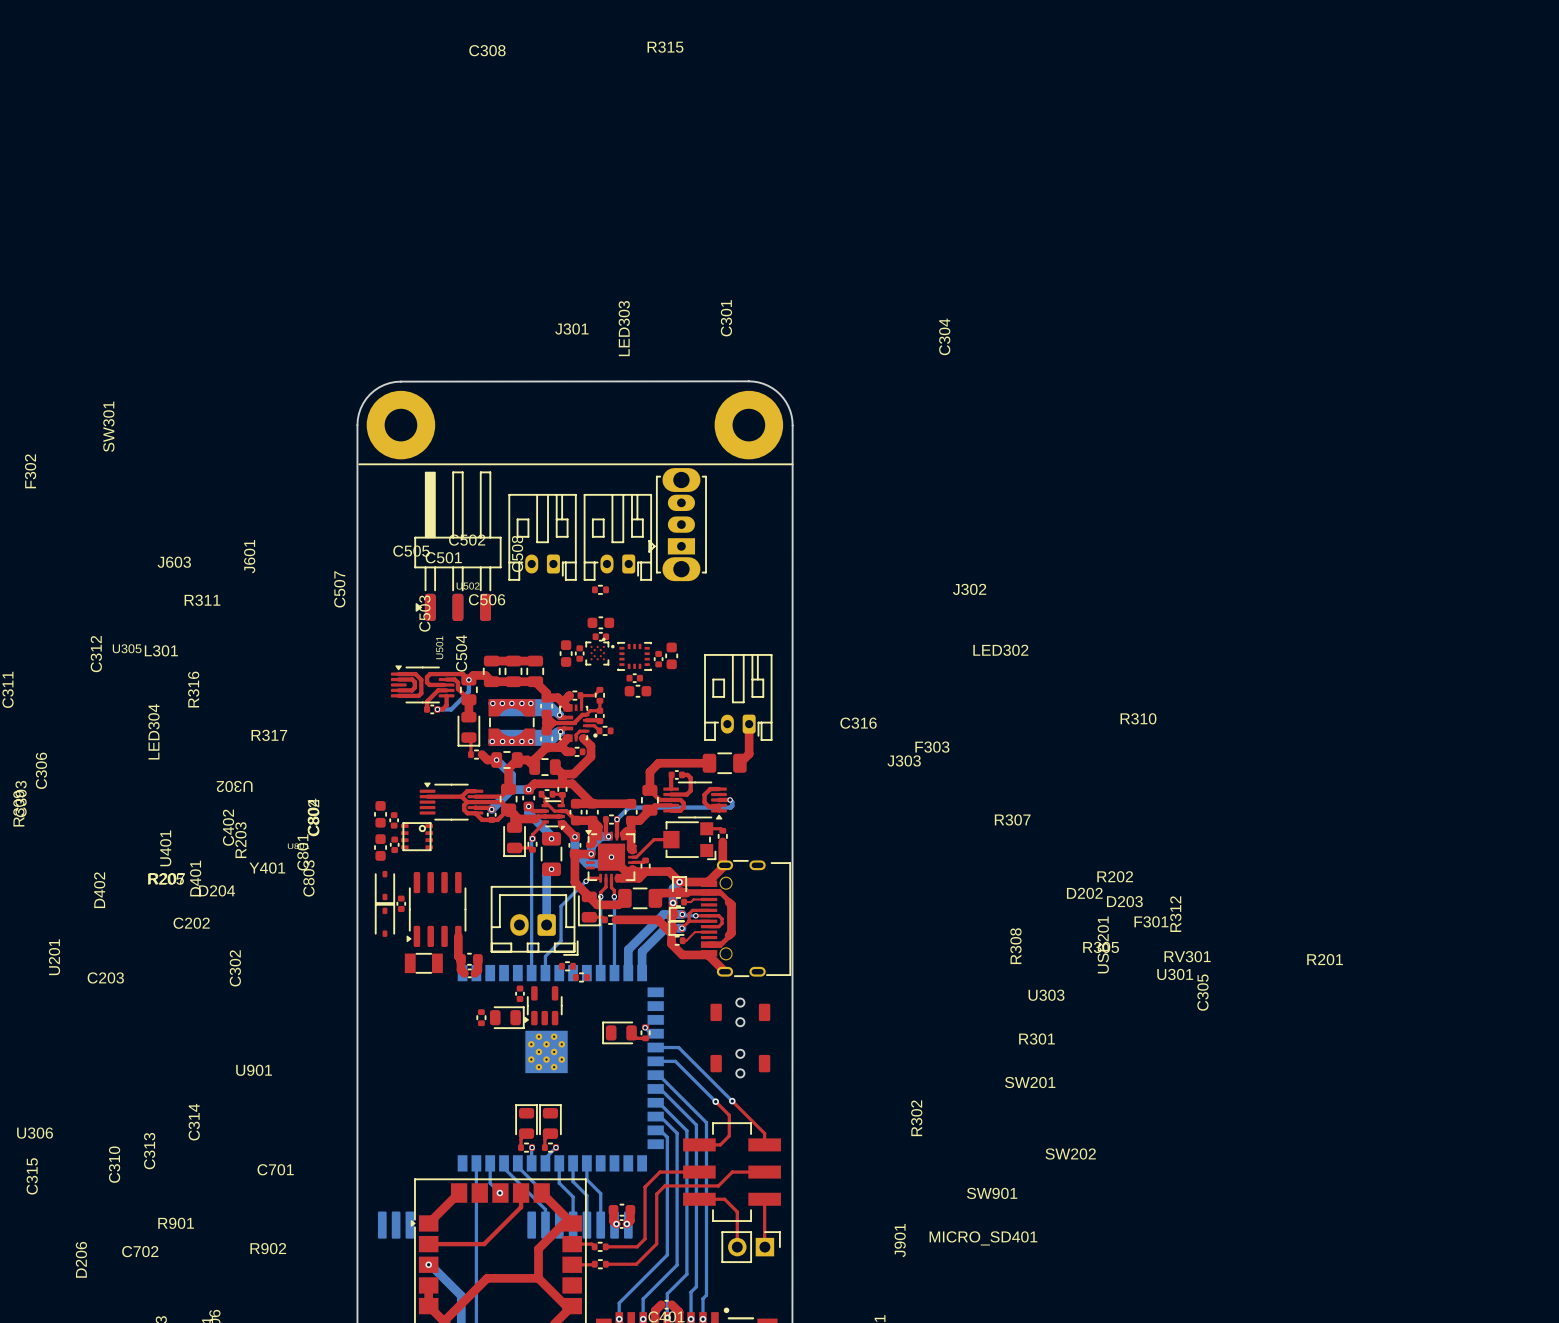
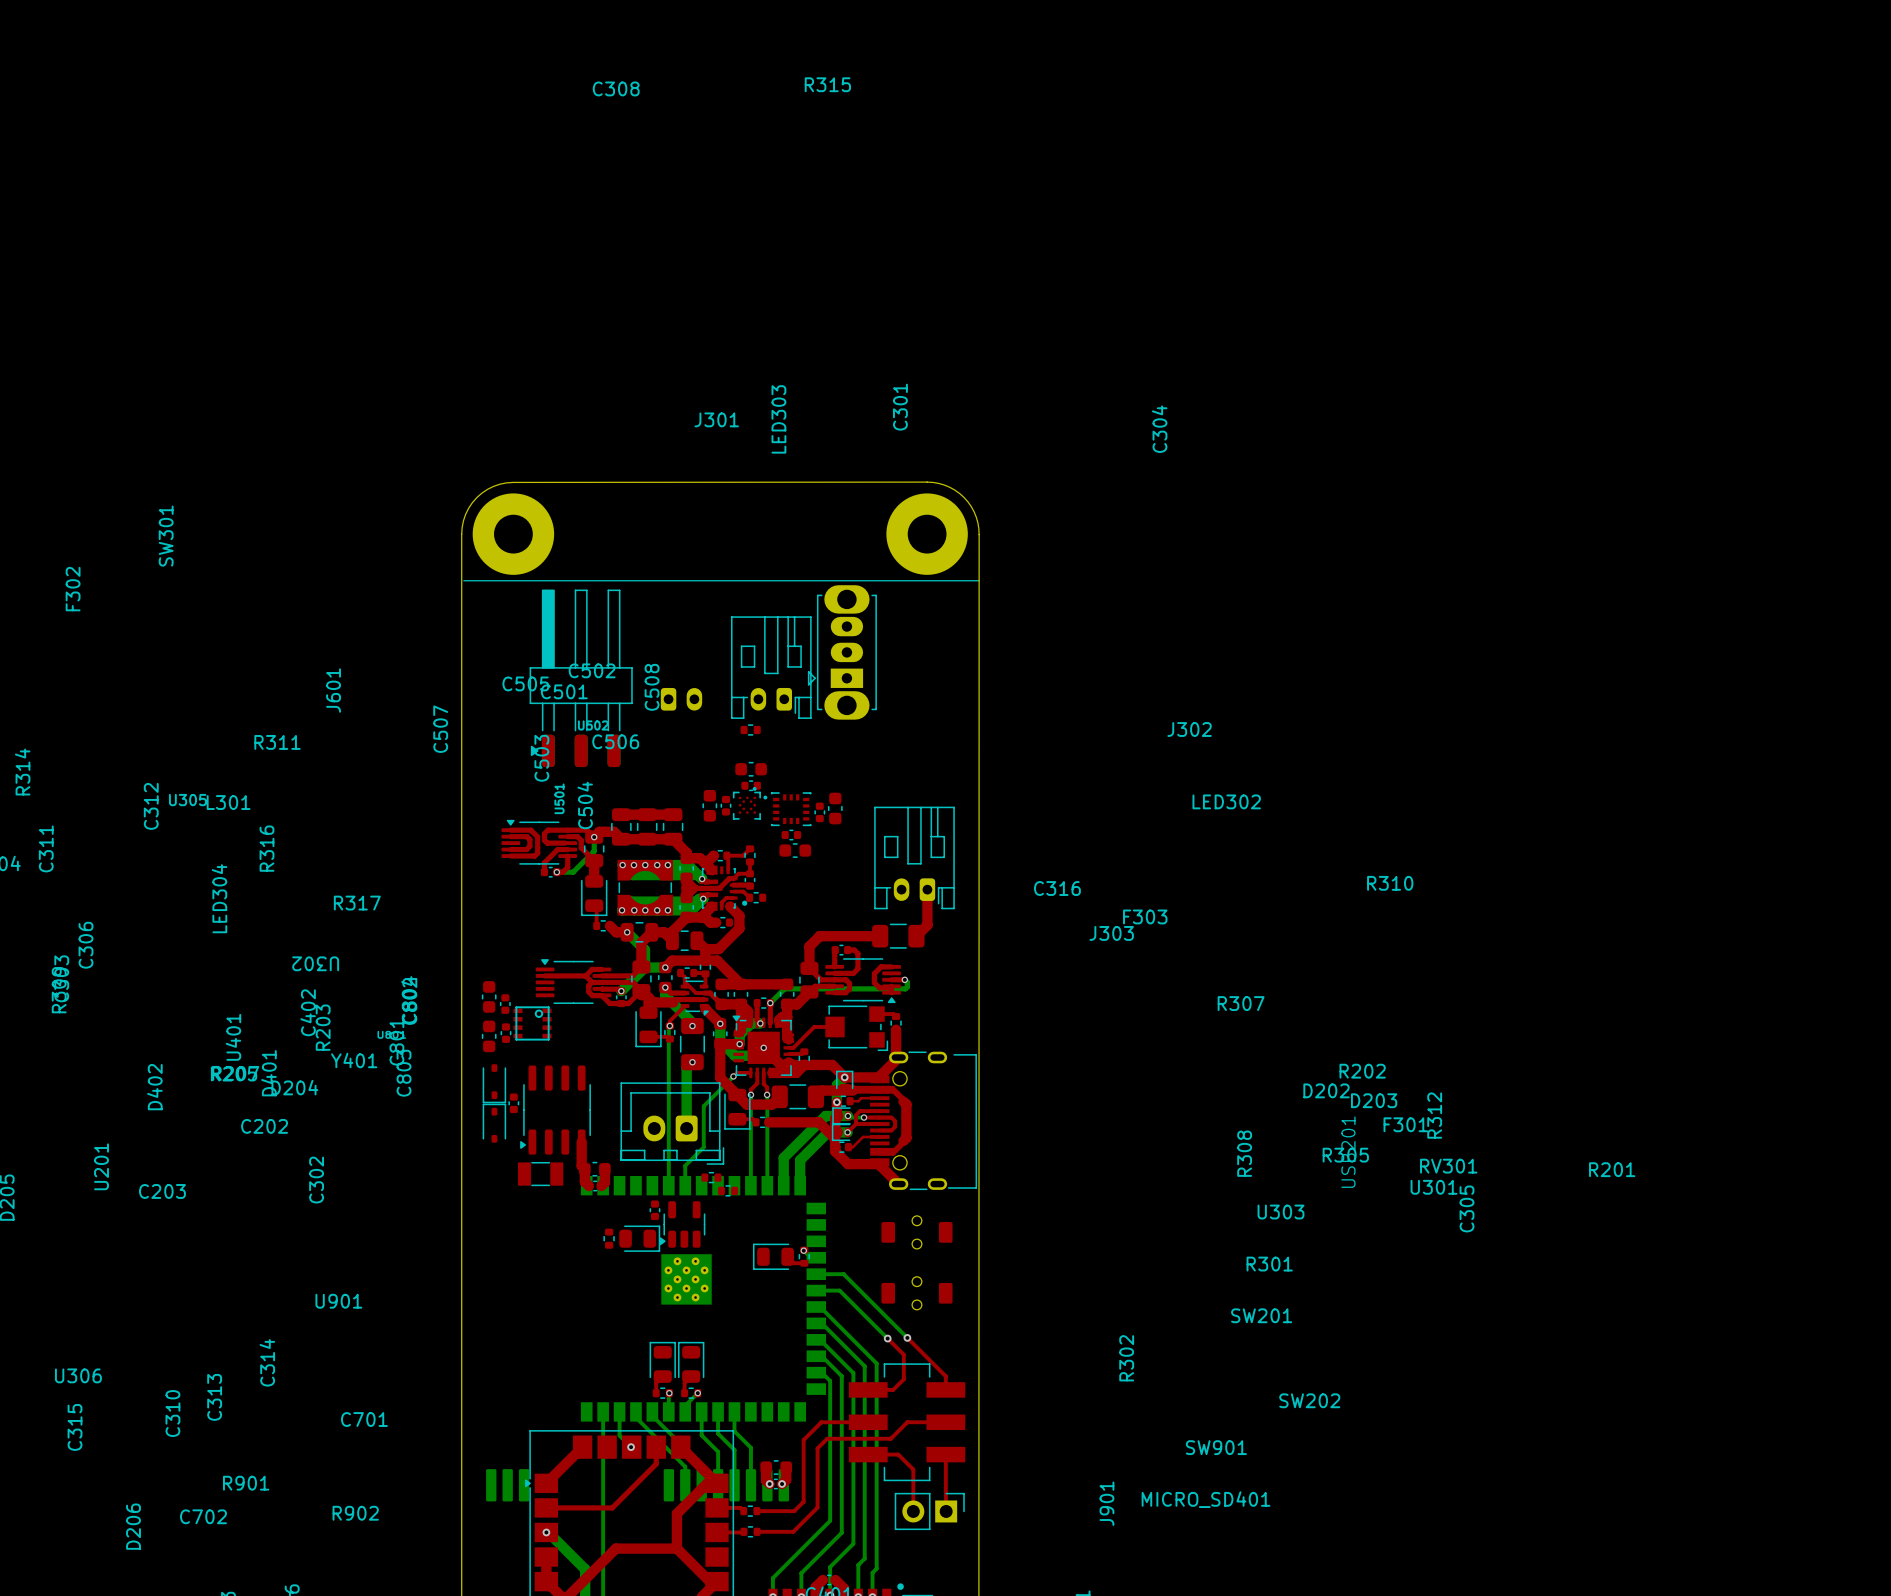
J603 side: top (542, 537) -> bottom (681, 699)

